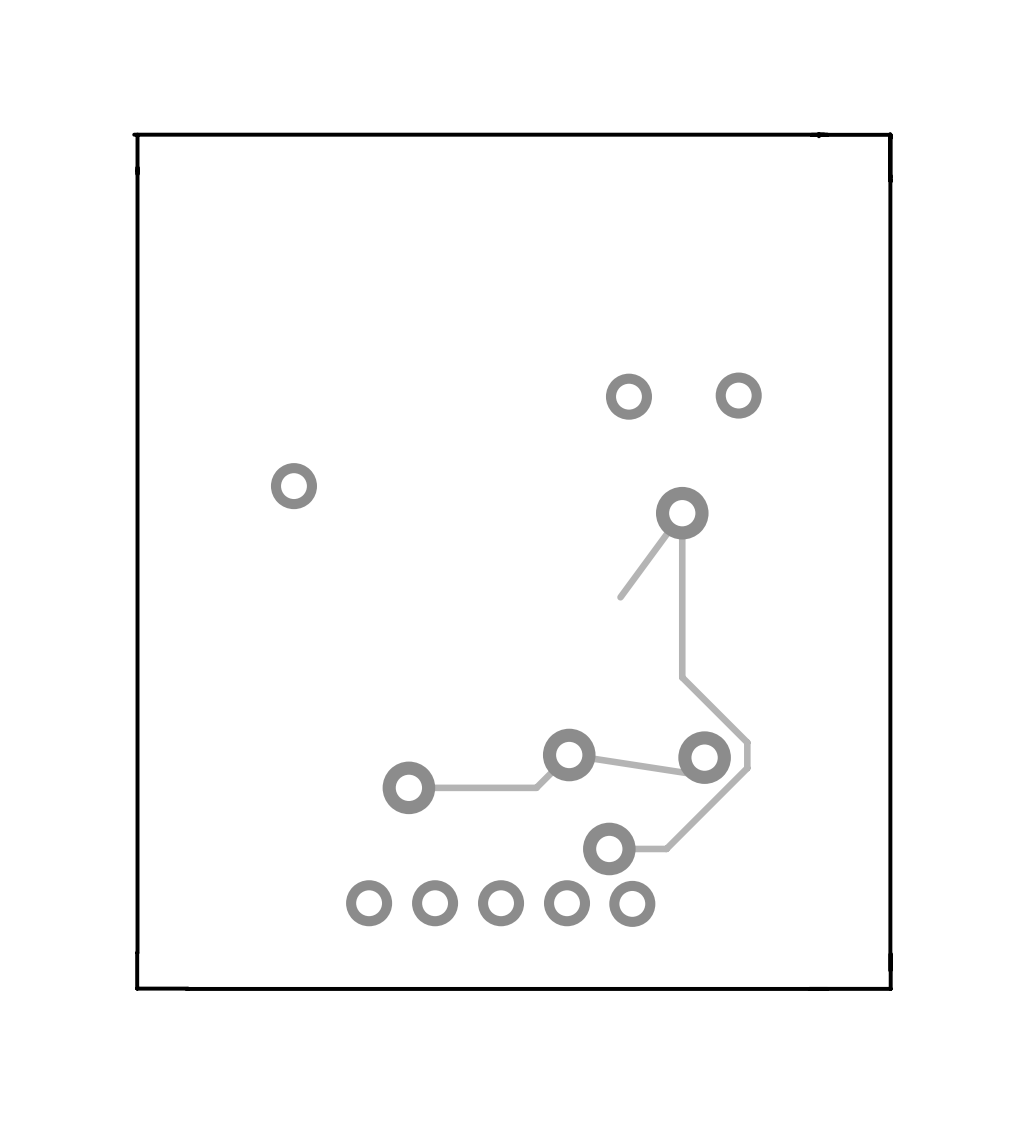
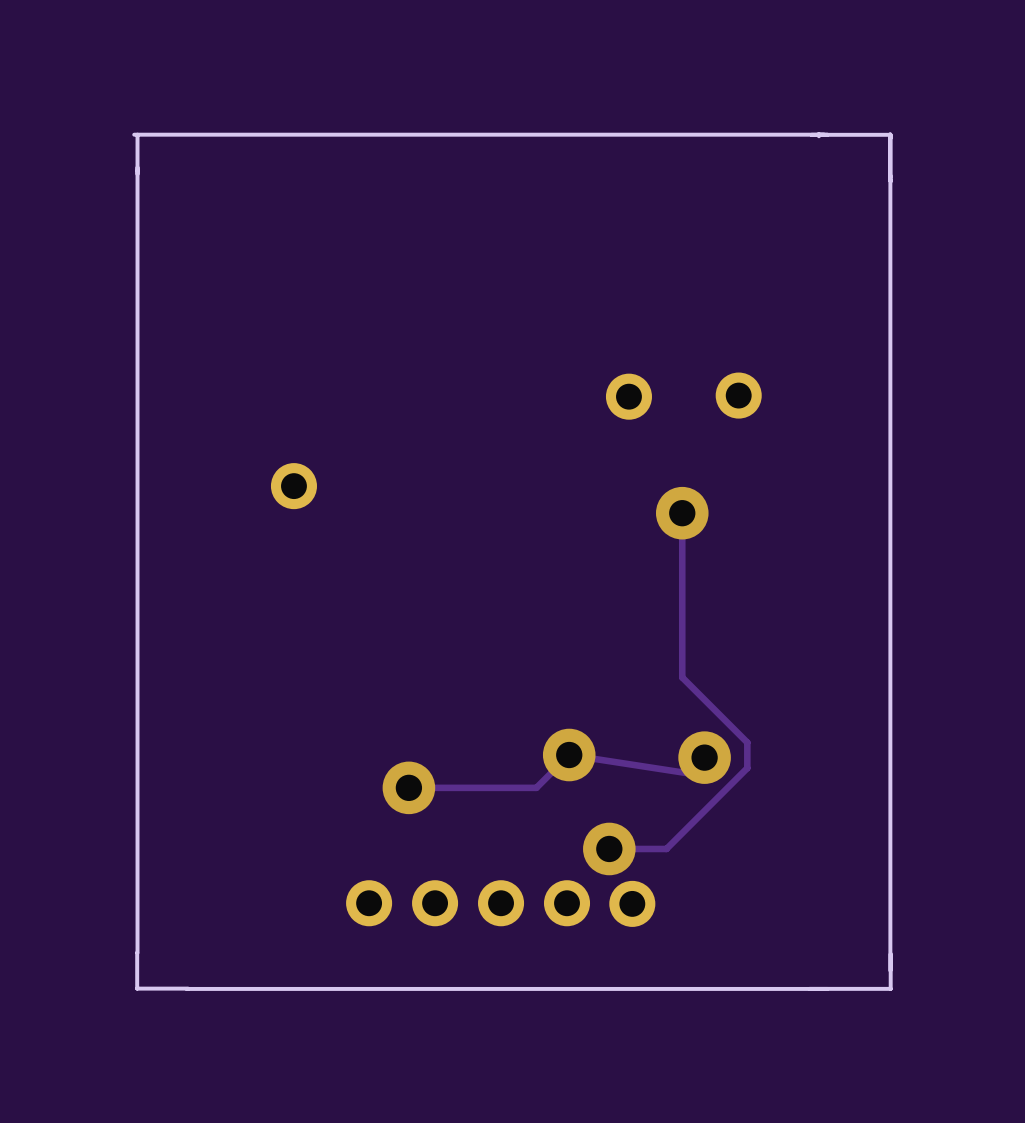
track: (682, 513) (620, 597) -> none

